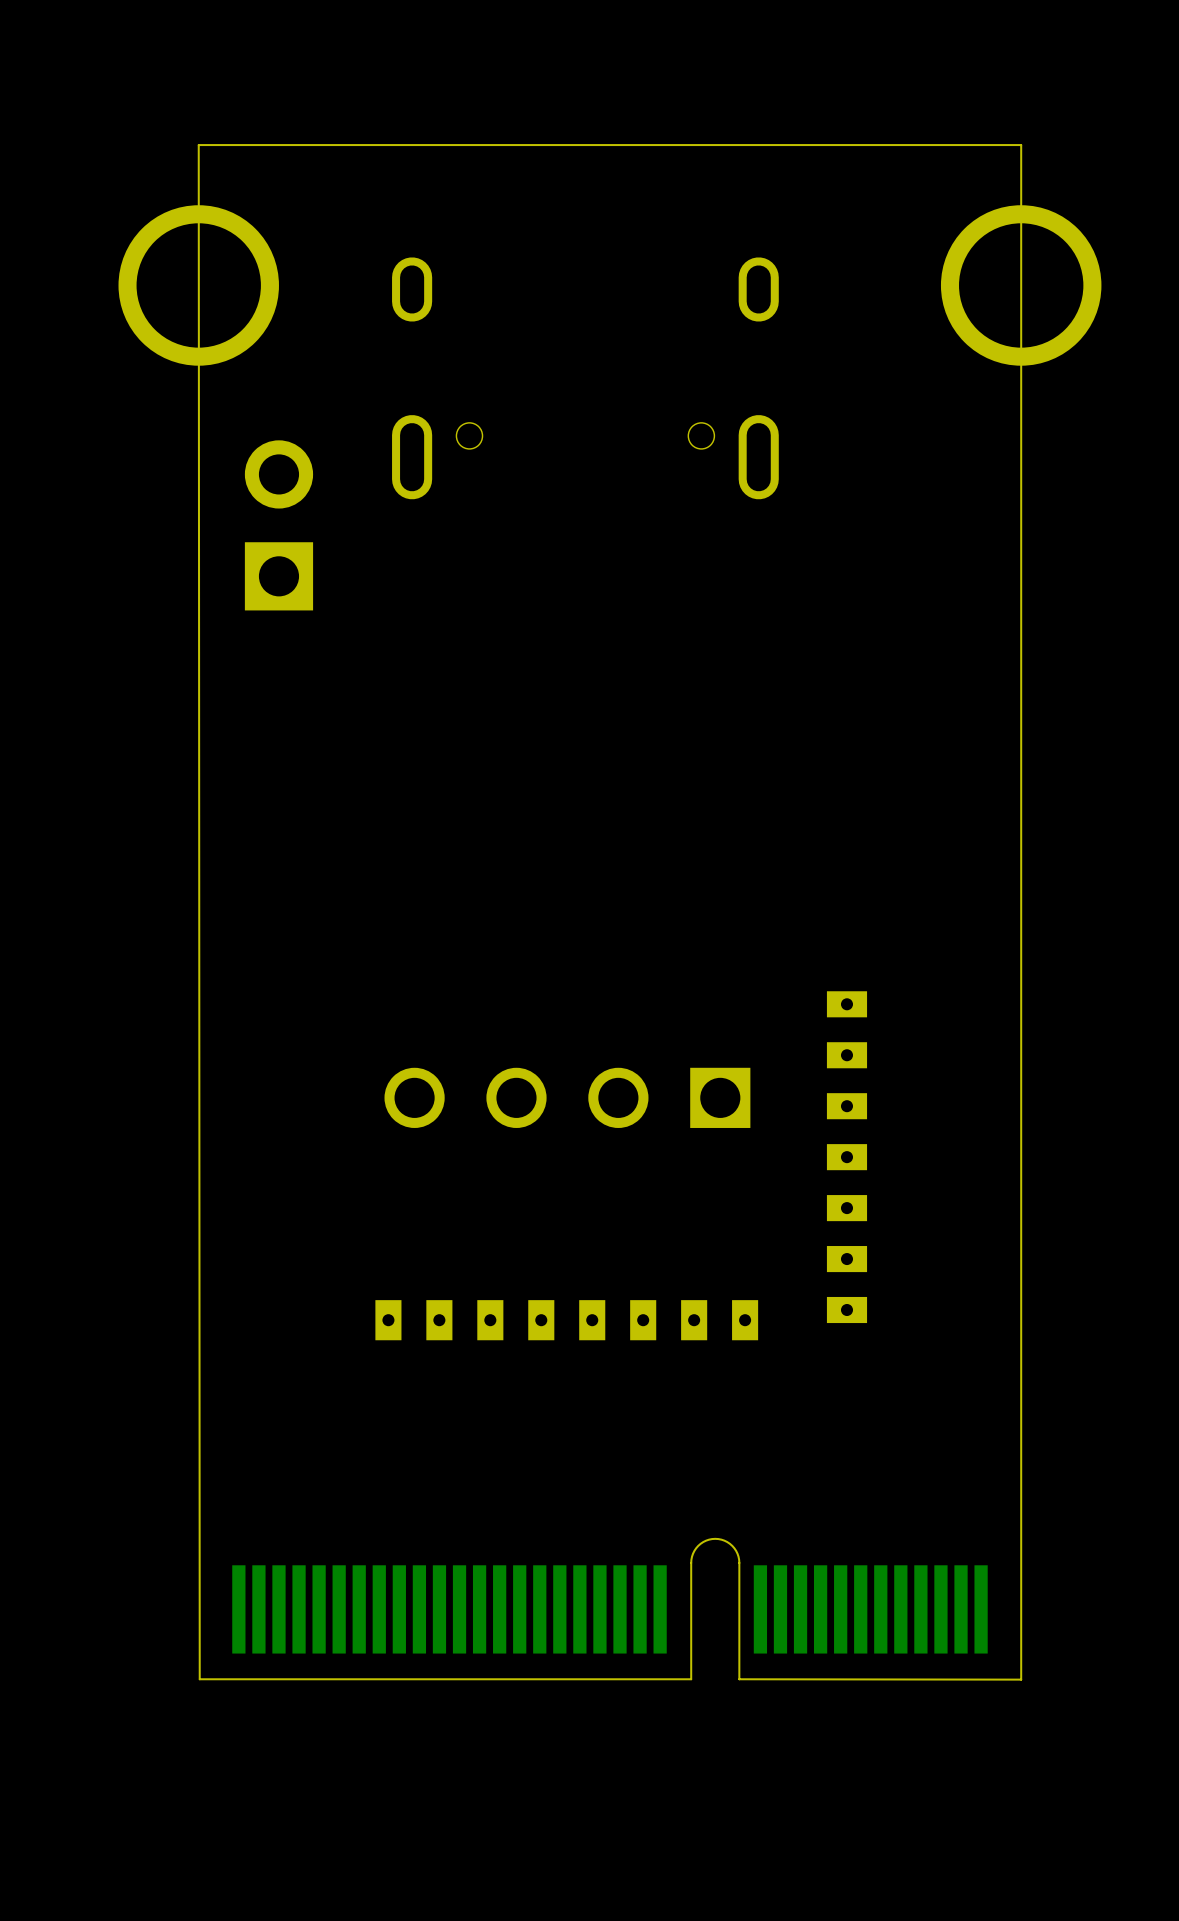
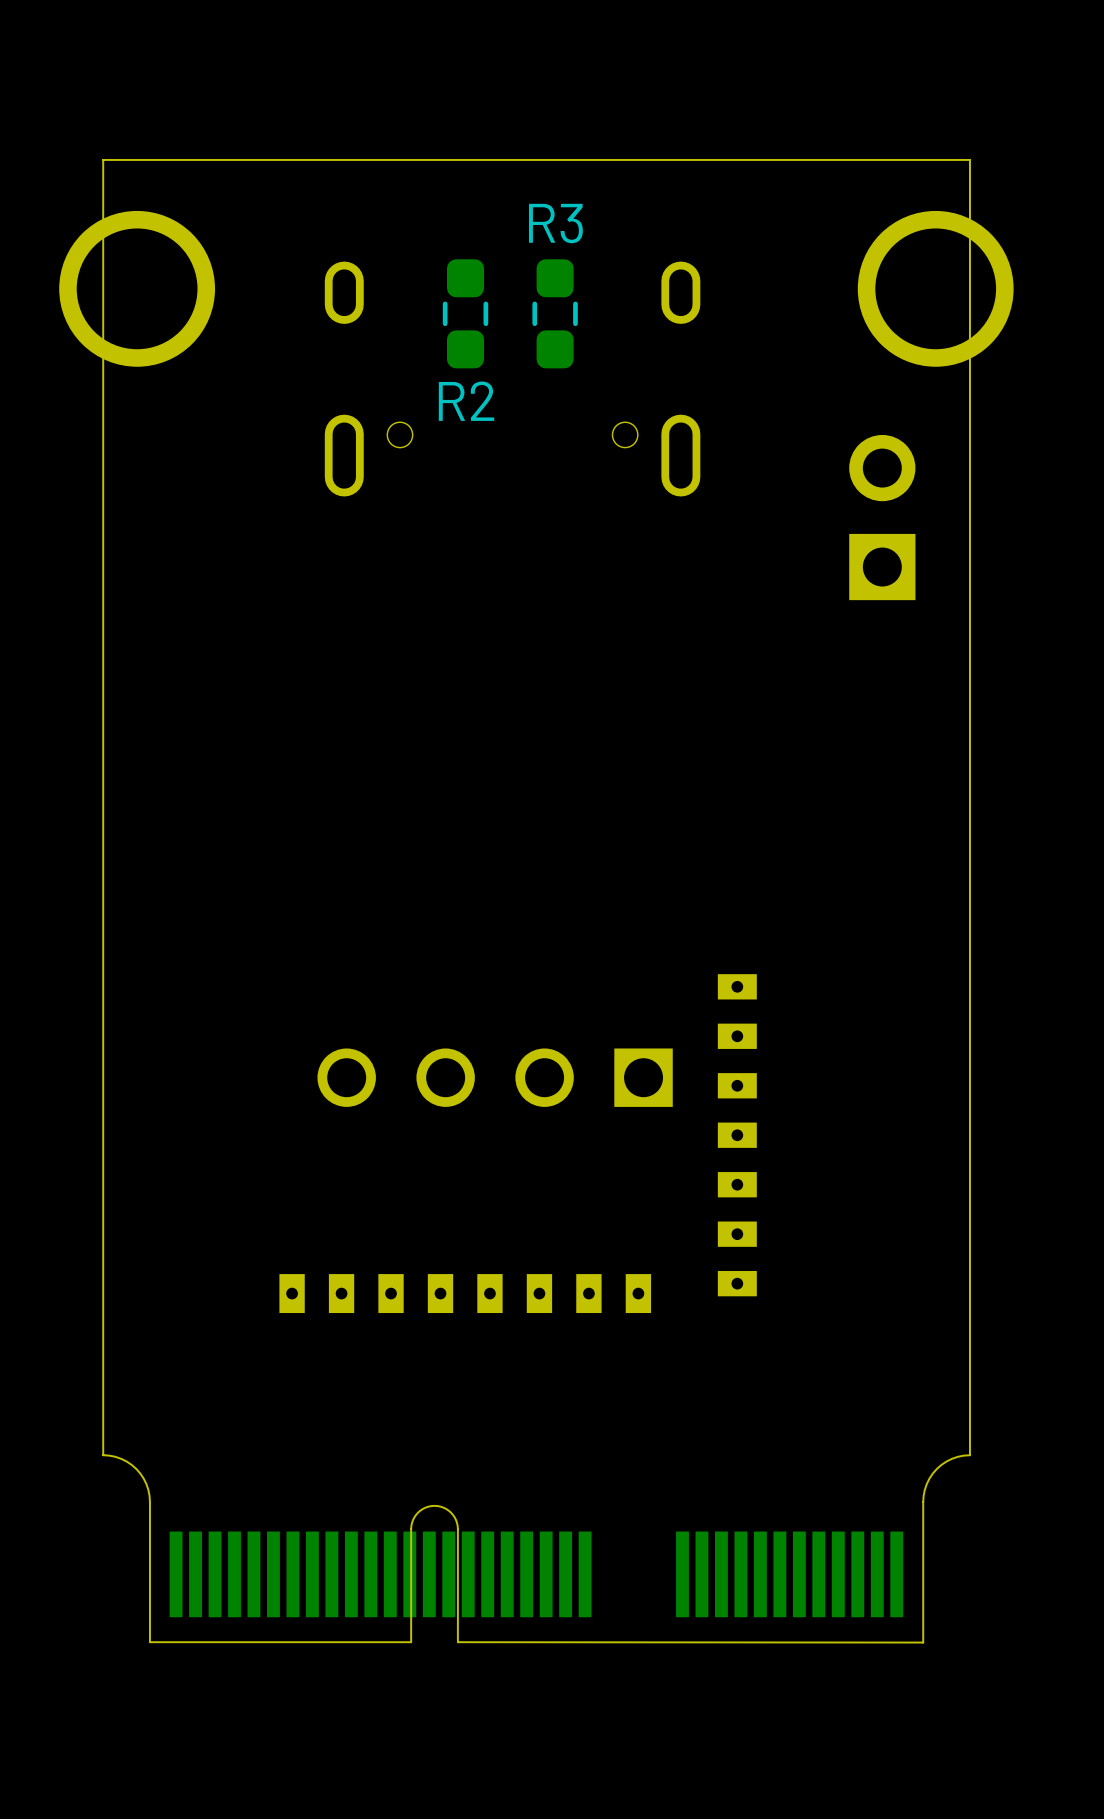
R2: none -> (465, 313)
R3: none -> (555, 313)
part position: (278, 525) -> (882, 517)
part position: (621, 1165) -> (518, 1143)
board edge: (480, 1679) (691, 1679) (691, 1559) (694, 1550) (700, 1543) (715, 1538) (729, 1543) (736, 1550) (739, 1559) (739, 1679) (1021, 1679) (1021, 145) (198, 145) (199, 1679) (211, 1679) -> (411, 1642) (411, 1526) (414, 1517) (420, 1510) (434, 1505) (448, 1510) (454, 1517) (457, 1526) (457, 1642) (923, 1642) (924, 1489) (929, 1478) (941, 1464) (957, 1456) (969, 1455) (969, 159) (103, 159) (103, 1455) (121, 1458) (131, 1464) (140, 1473) (148, 1489) (149, 1642)

